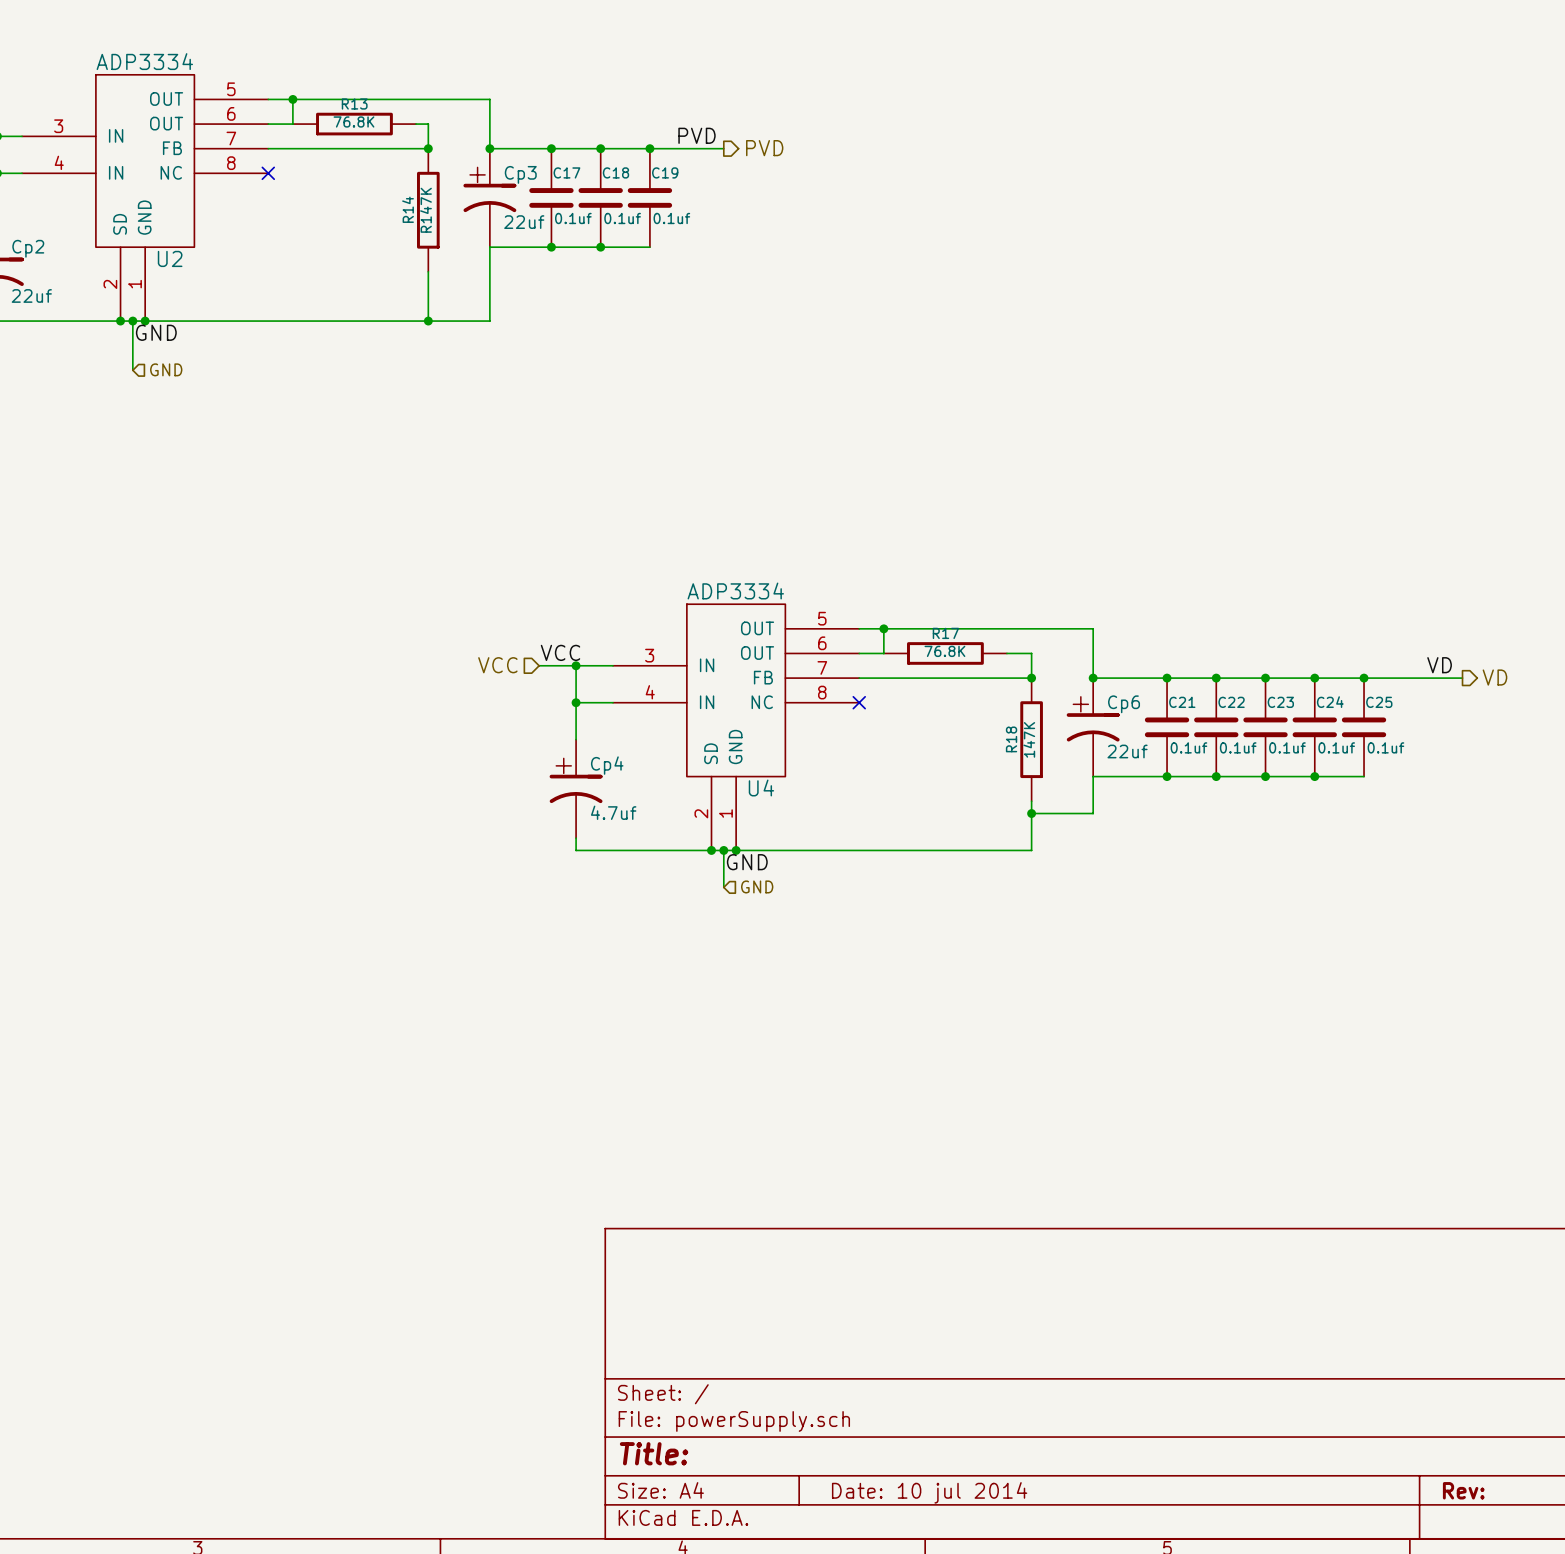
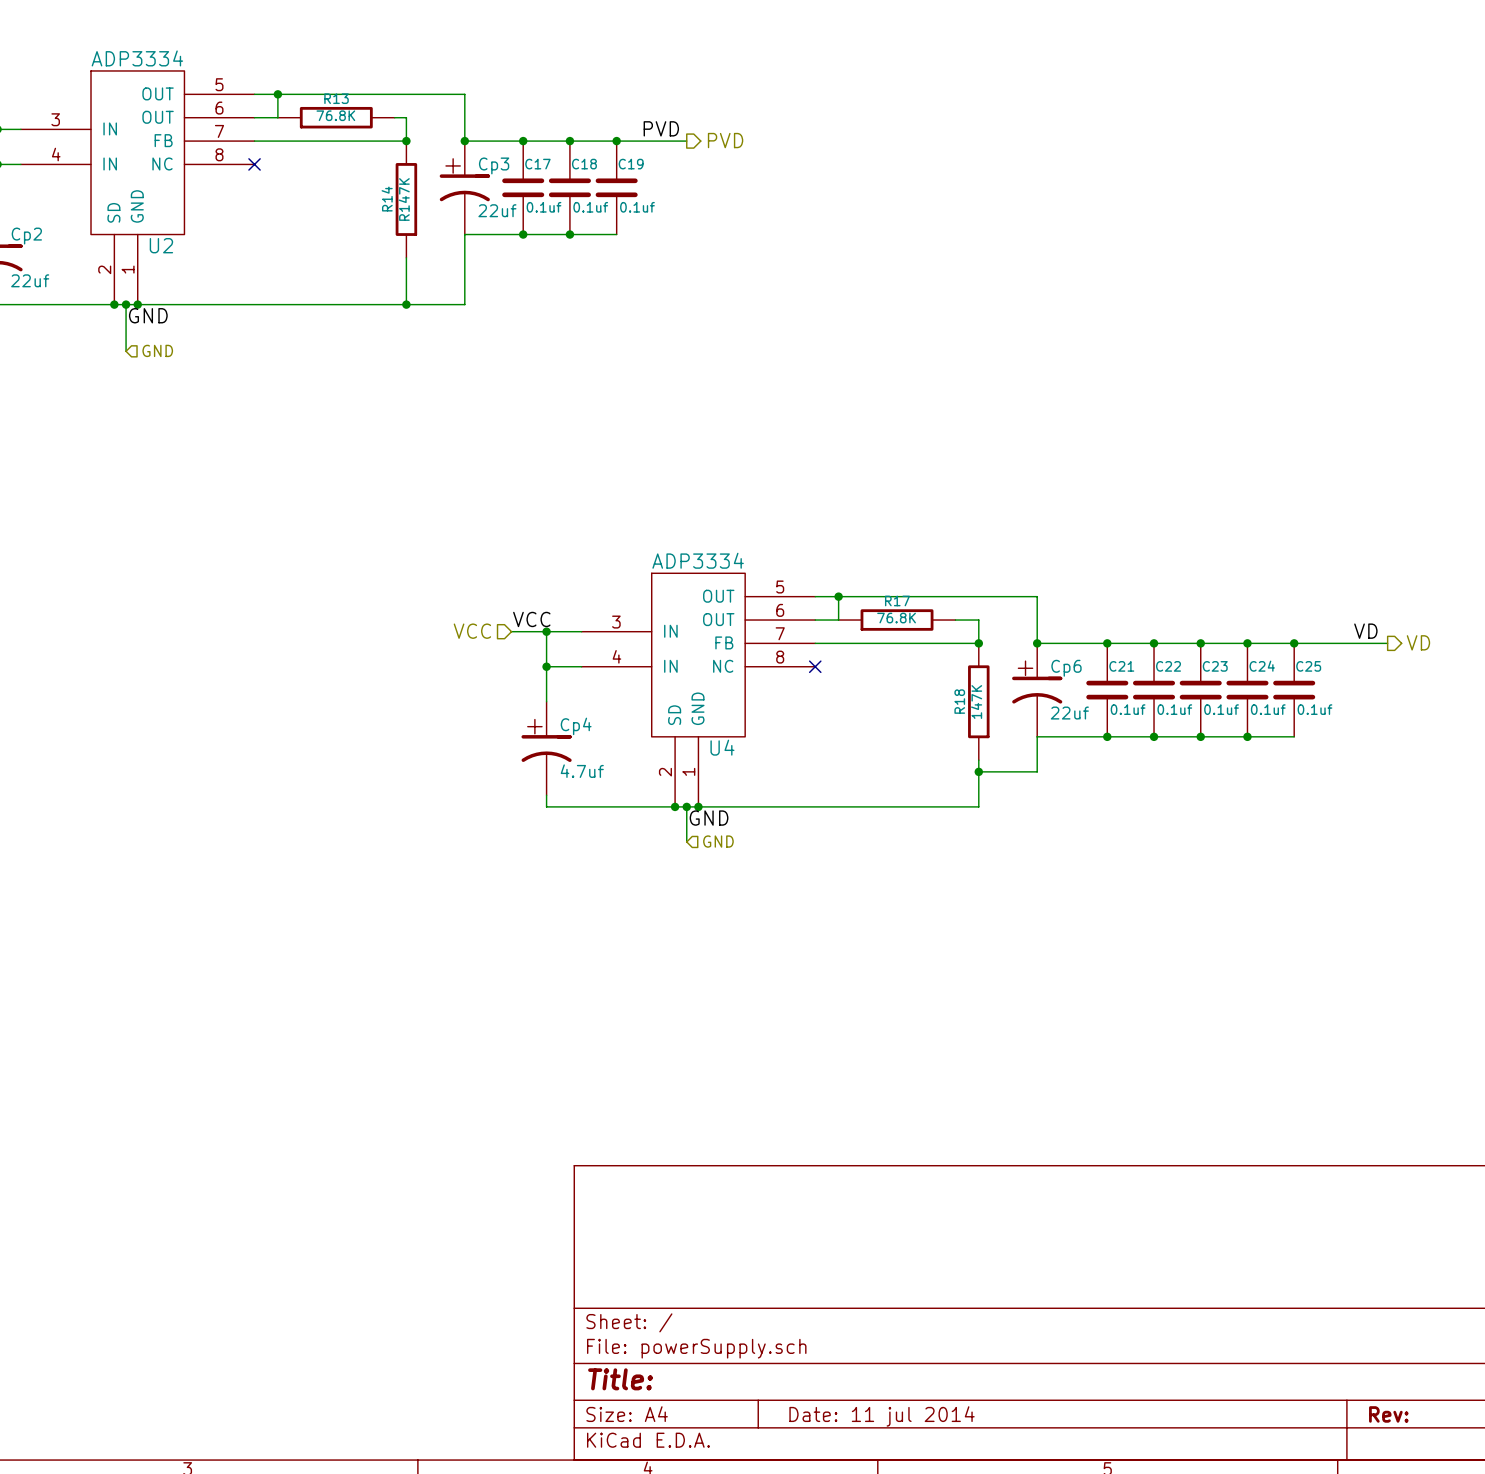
title block: Date: 10 jul 2014 (929, 1492) -> Date: 11 jul 2014 (882, 1416)

